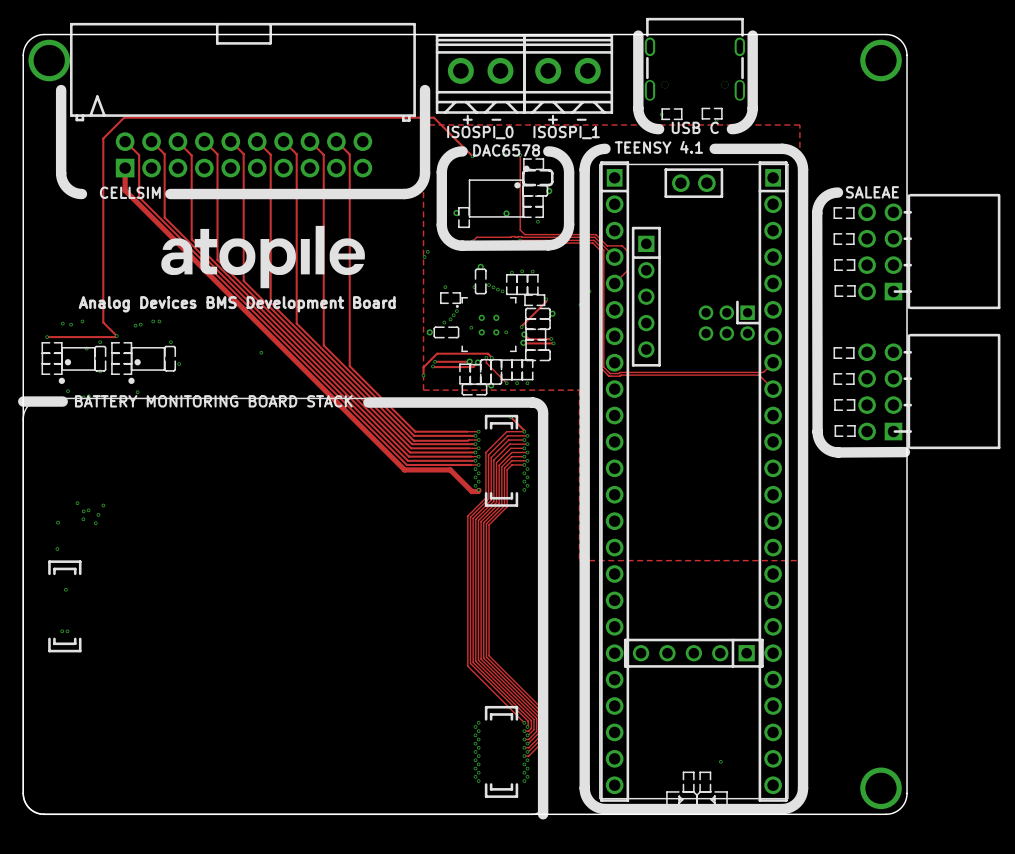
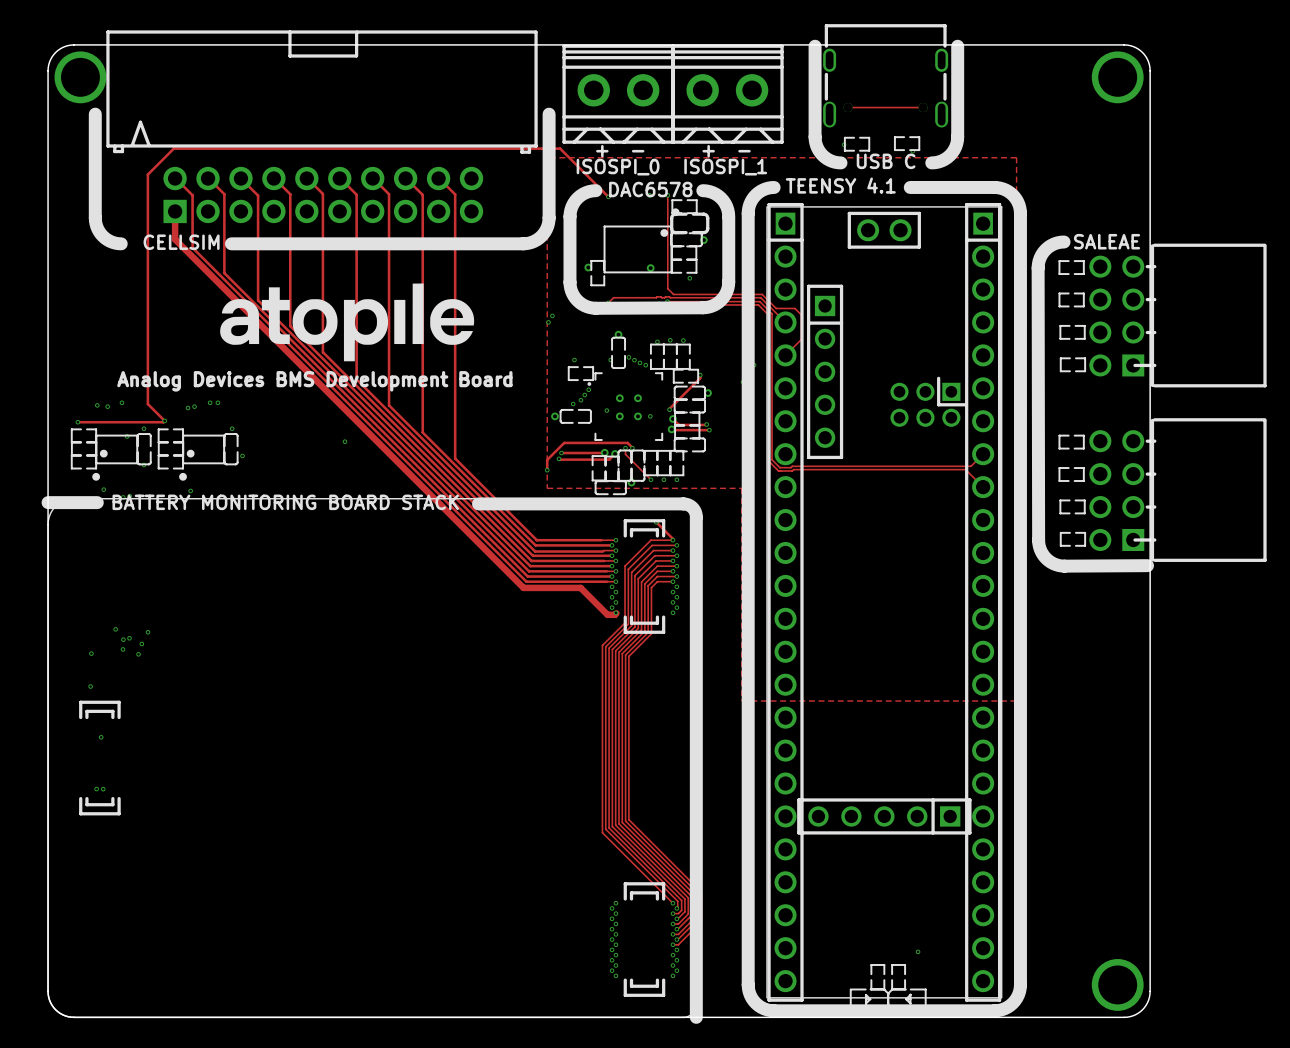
track: none -> (848, 107) (923, 107)

